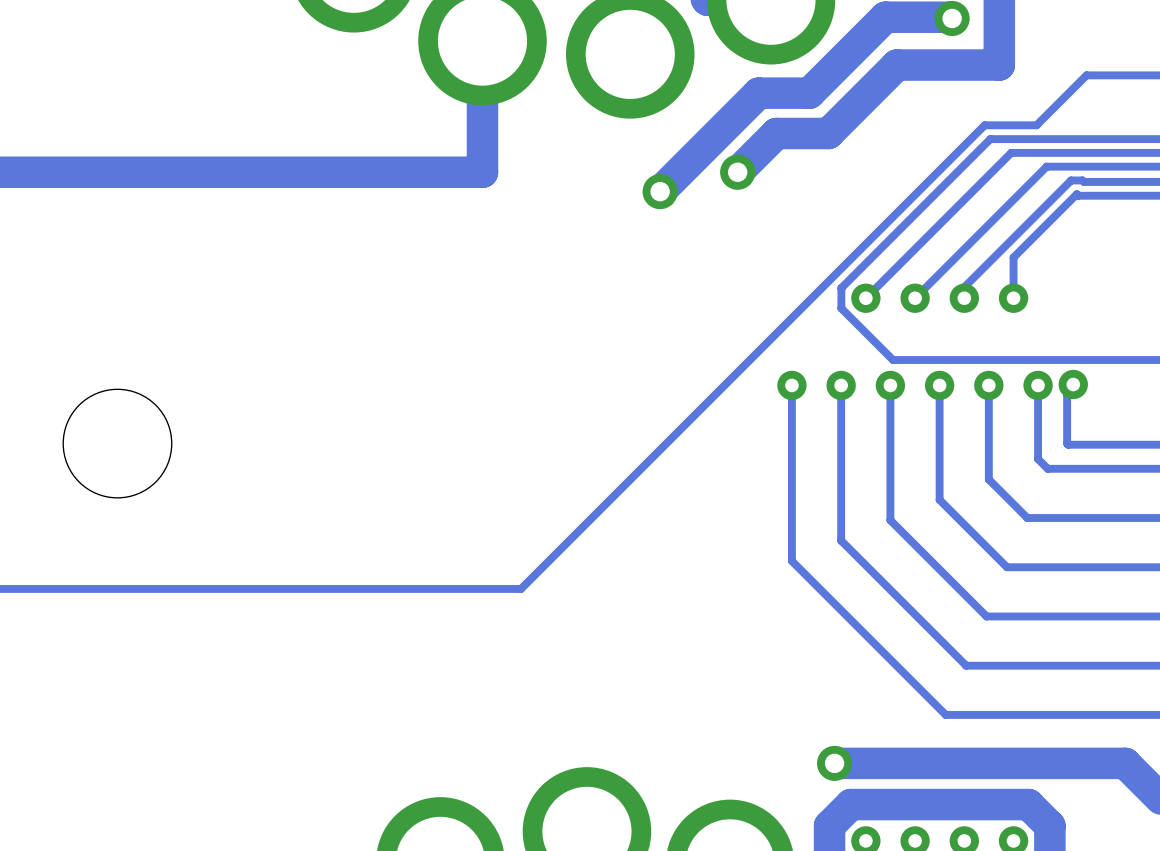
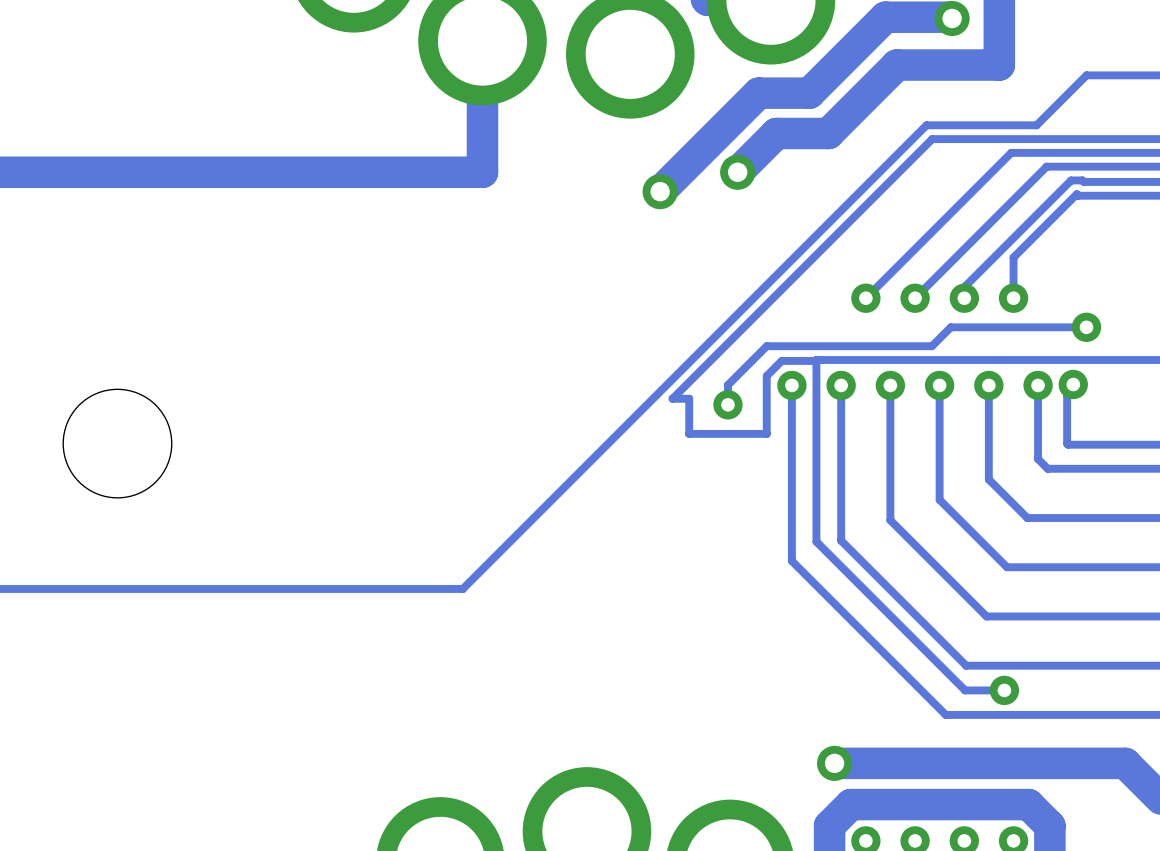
track: (984, 125) (521, 588) (462, 588) -> (984, 125) (926, 125) (462, 588)
track: (990, 139) (841, 288) (841, 308) (892, 360) -> (990, 139) (932, 139) (672, 398) (689, 398) (689, 433) (766, 433) (766, 375) (781, 360) (816, 360)
track: none -> (1086, 327) (950, 327) (931, 346) (766, 346) (727, 384) (727, 404)
via: none -> (1086, 327)
track: none -> (816, 360) (816, 541) (965, 690) (1004, 690)
track: none -> (892, 360) (816, 360)
via: none -> (727, 404)
via: none -> (1004, 690)

